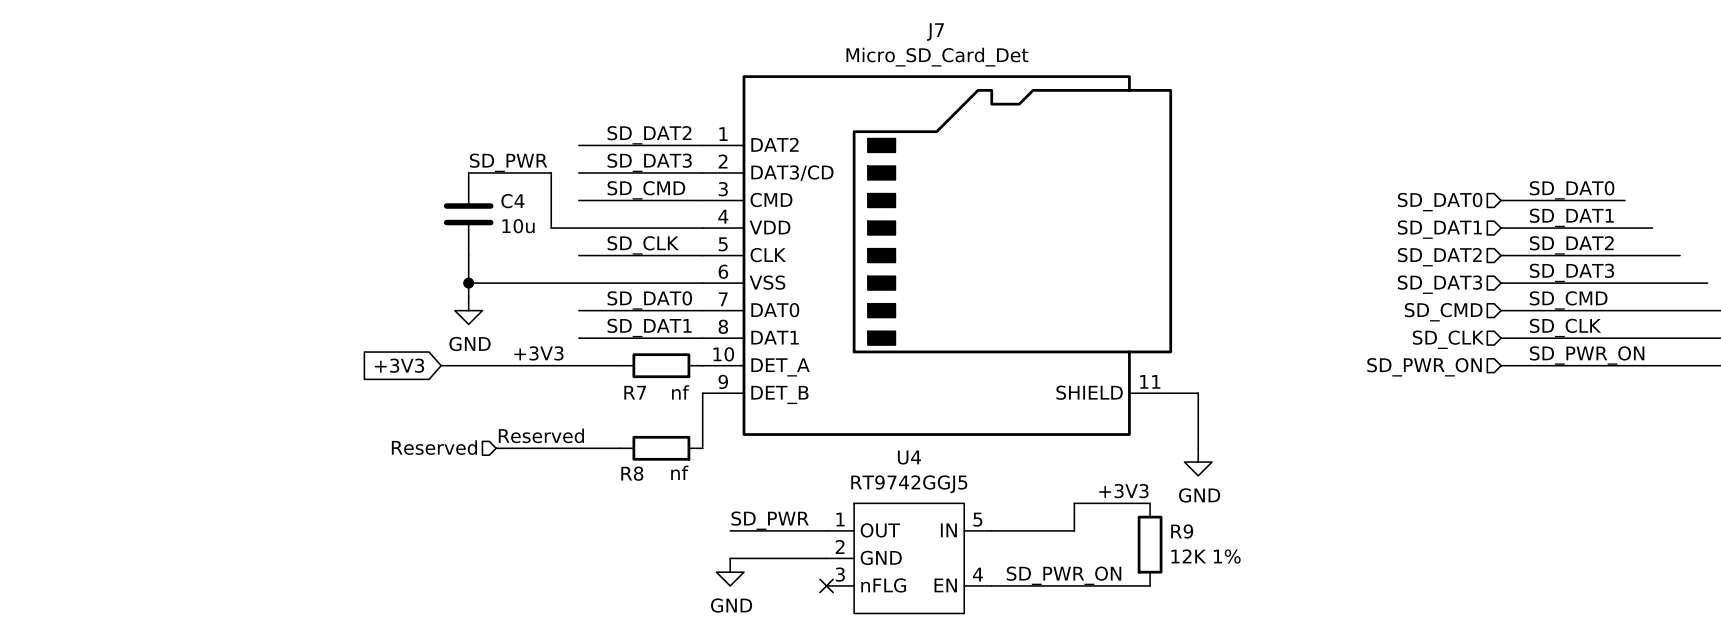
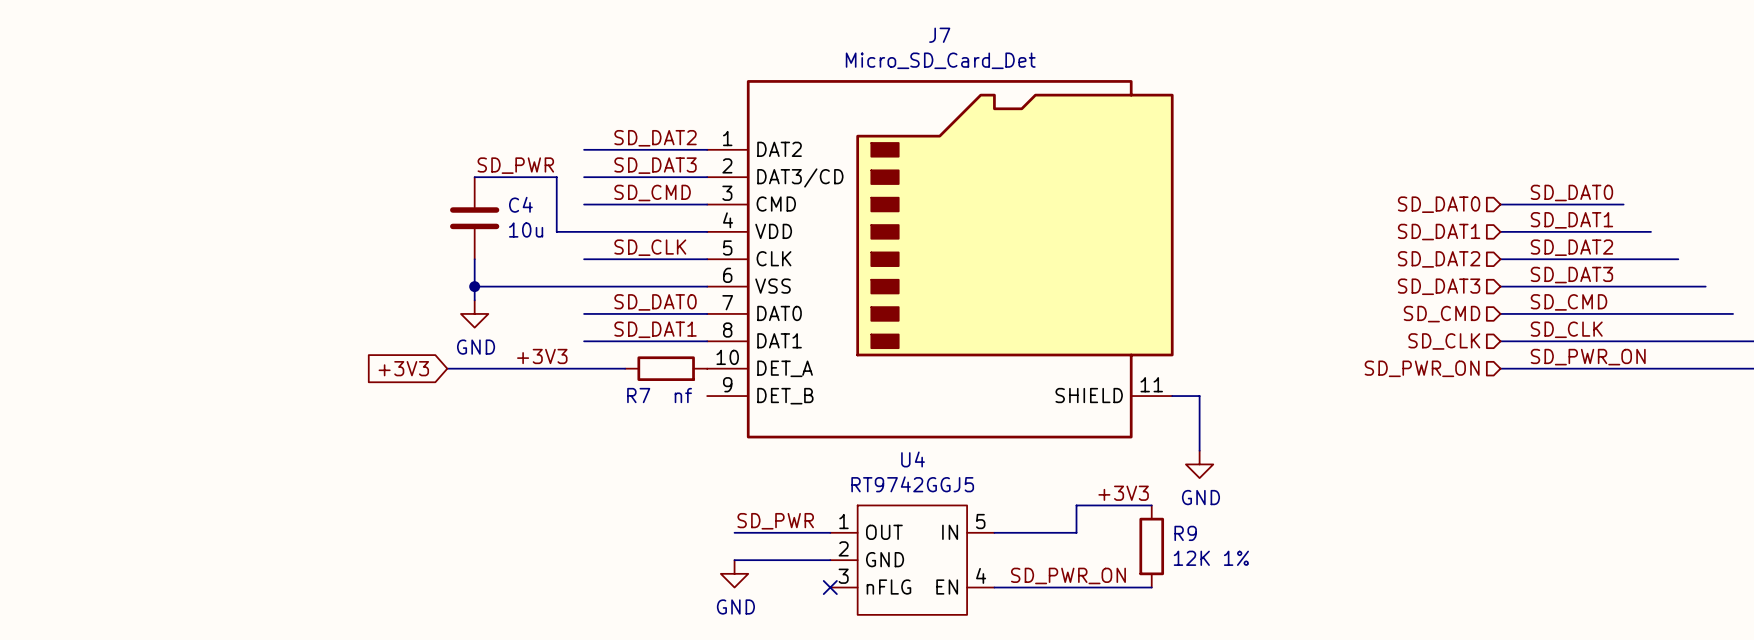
wire: (702, 393) (702, 448) -> none
label: Reserved (541, 435) -> none
hierarchical label: Reserved (434, 447) -> none
wire: (496, 448) (620, 448) -> none
R8: nf (661, 448) -> none

